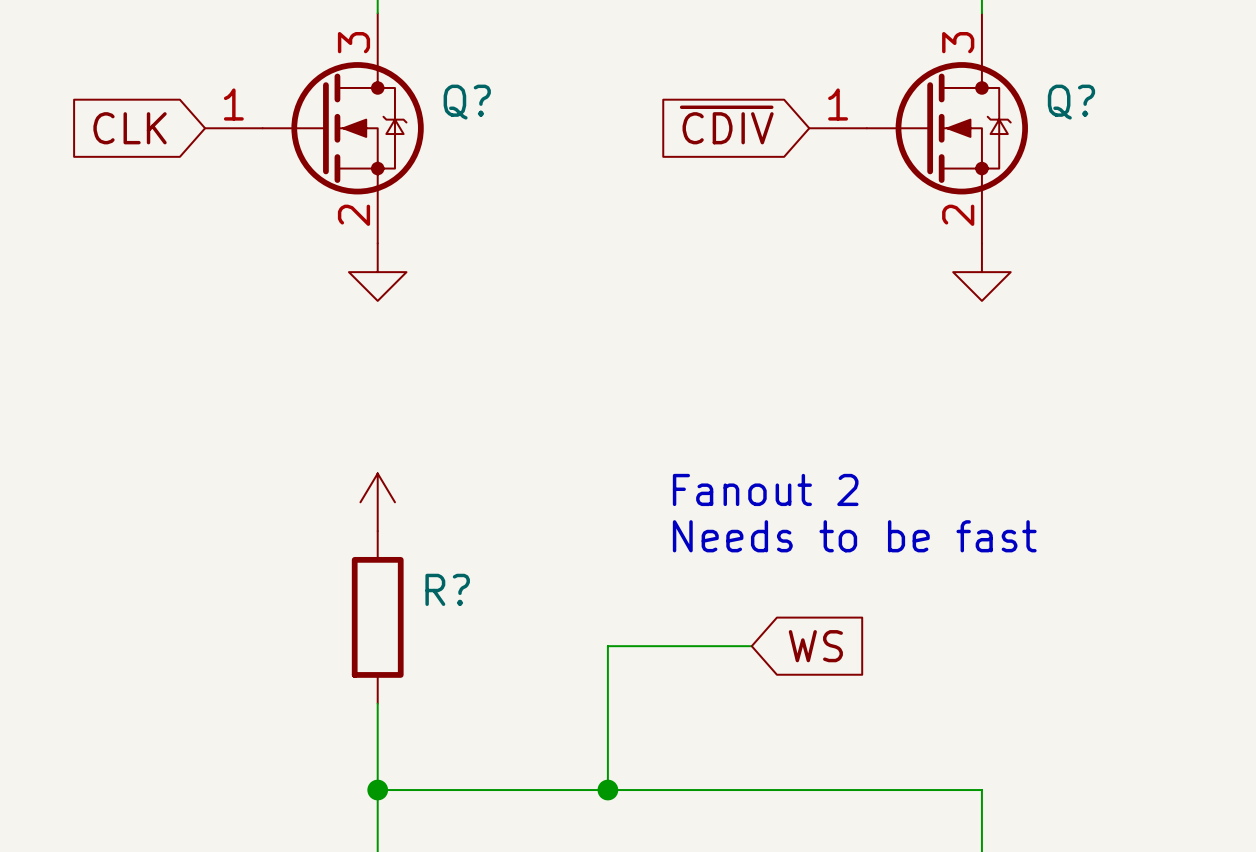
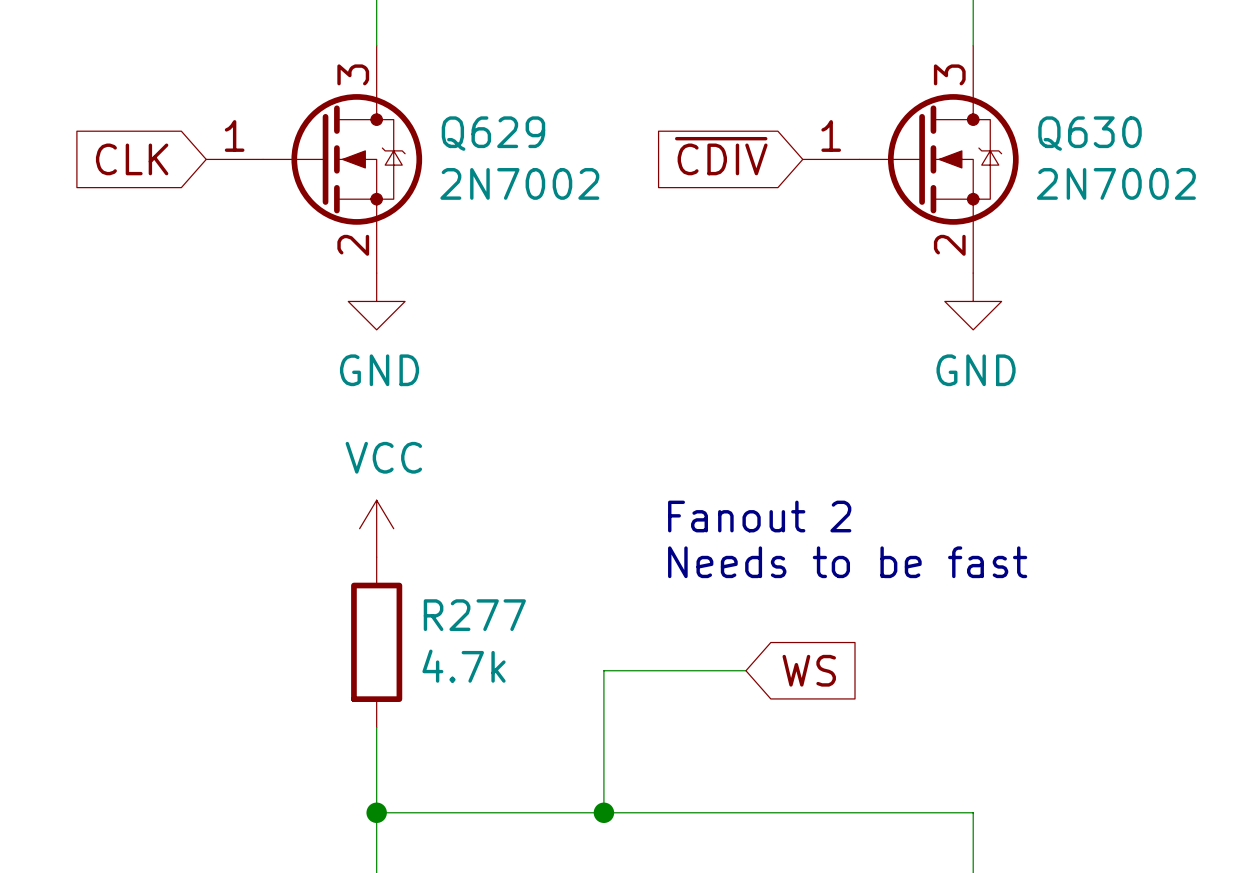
Q? name: Q? (467, 102) -> Q629 (493, 133)
Q? name: Q? (1071, 102) -> Q630 (1090, 133)
Q? value: none -> 2N7002 (519, 183)
Q? value: none -> 2N7002 (1116, 183)
power symbol text: none -> GND (379, 370)
power symbol text: none -> GND (976, 370)
power symbol text: none -> VCC (383, 457)
R? name: R? (447, 589) -> R277 (474, 615)
R? value: none -> 4.7k (464, 666)

